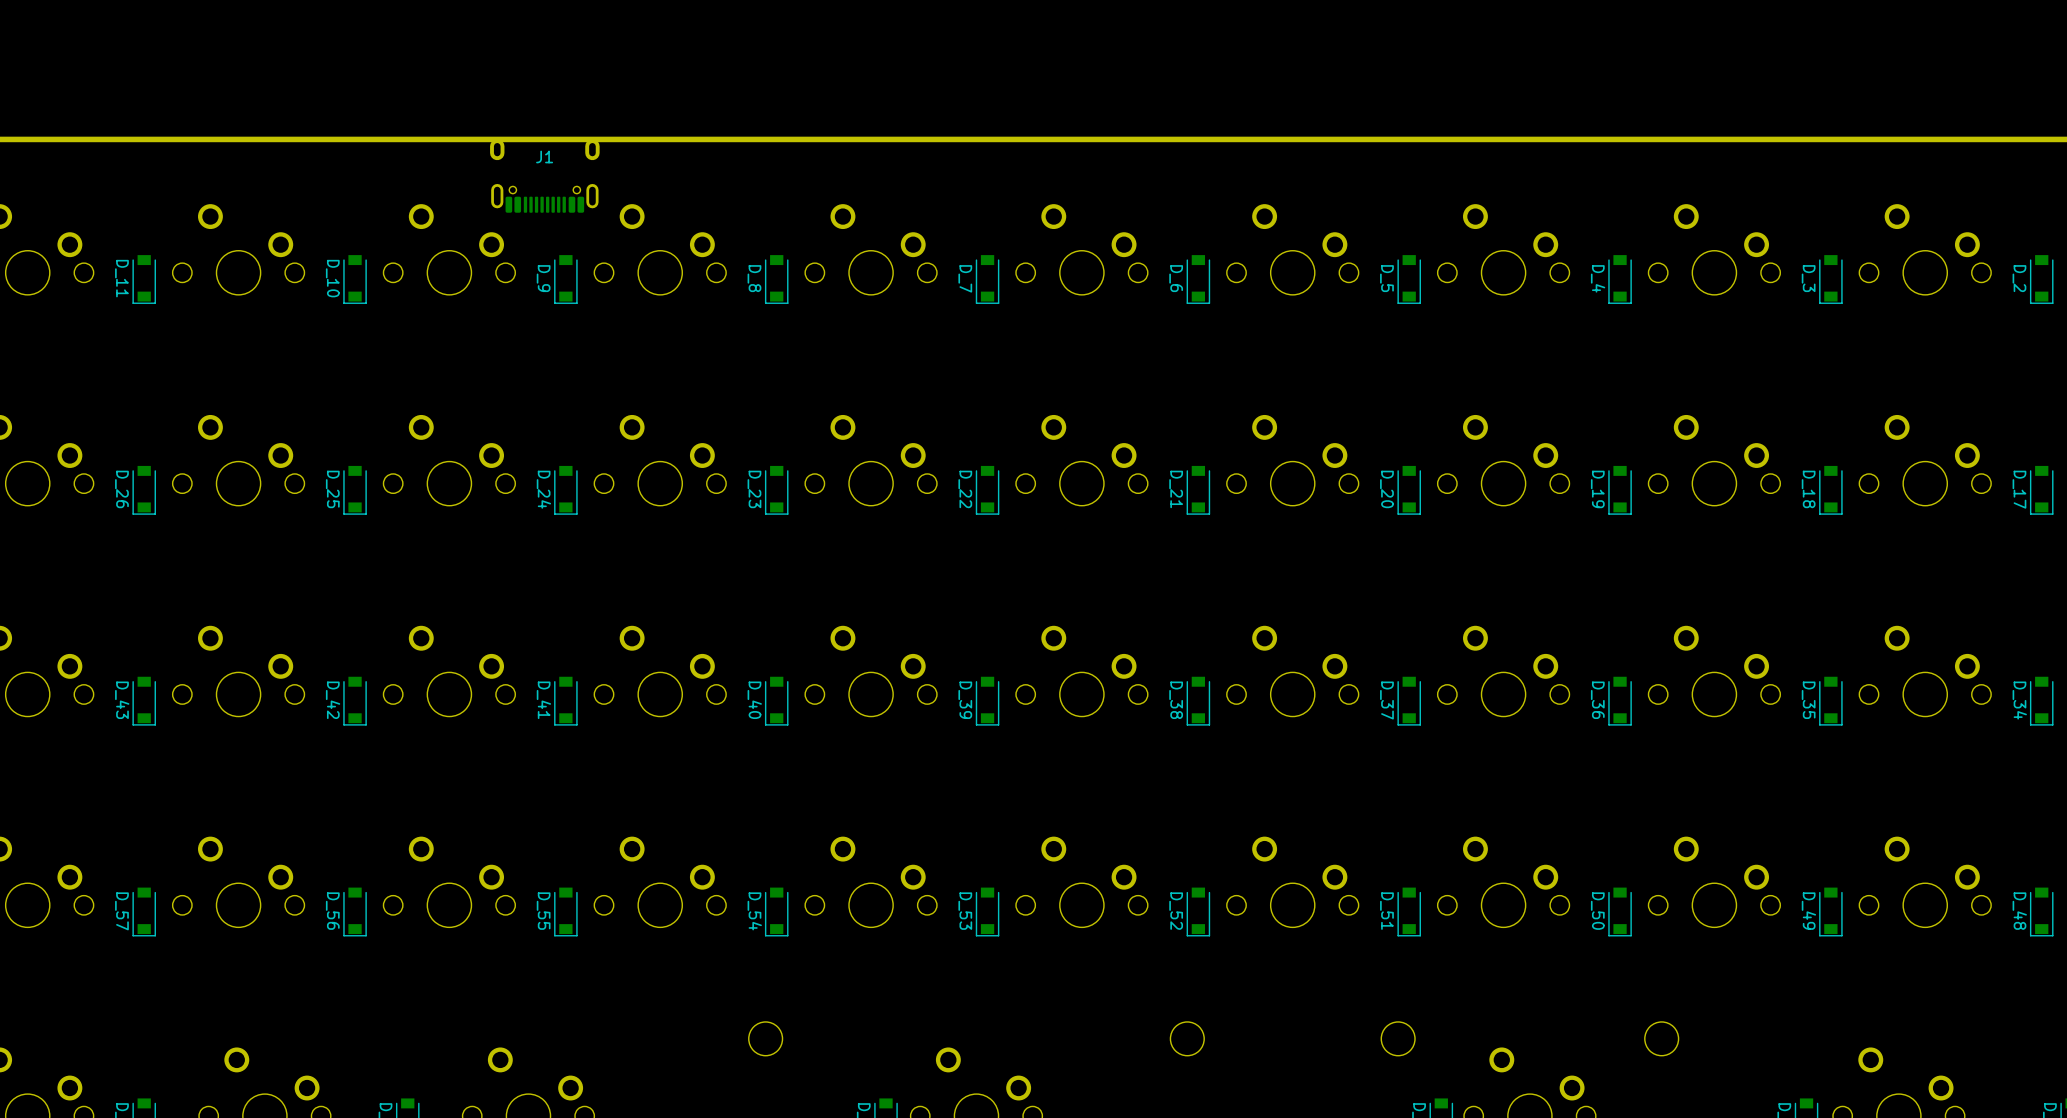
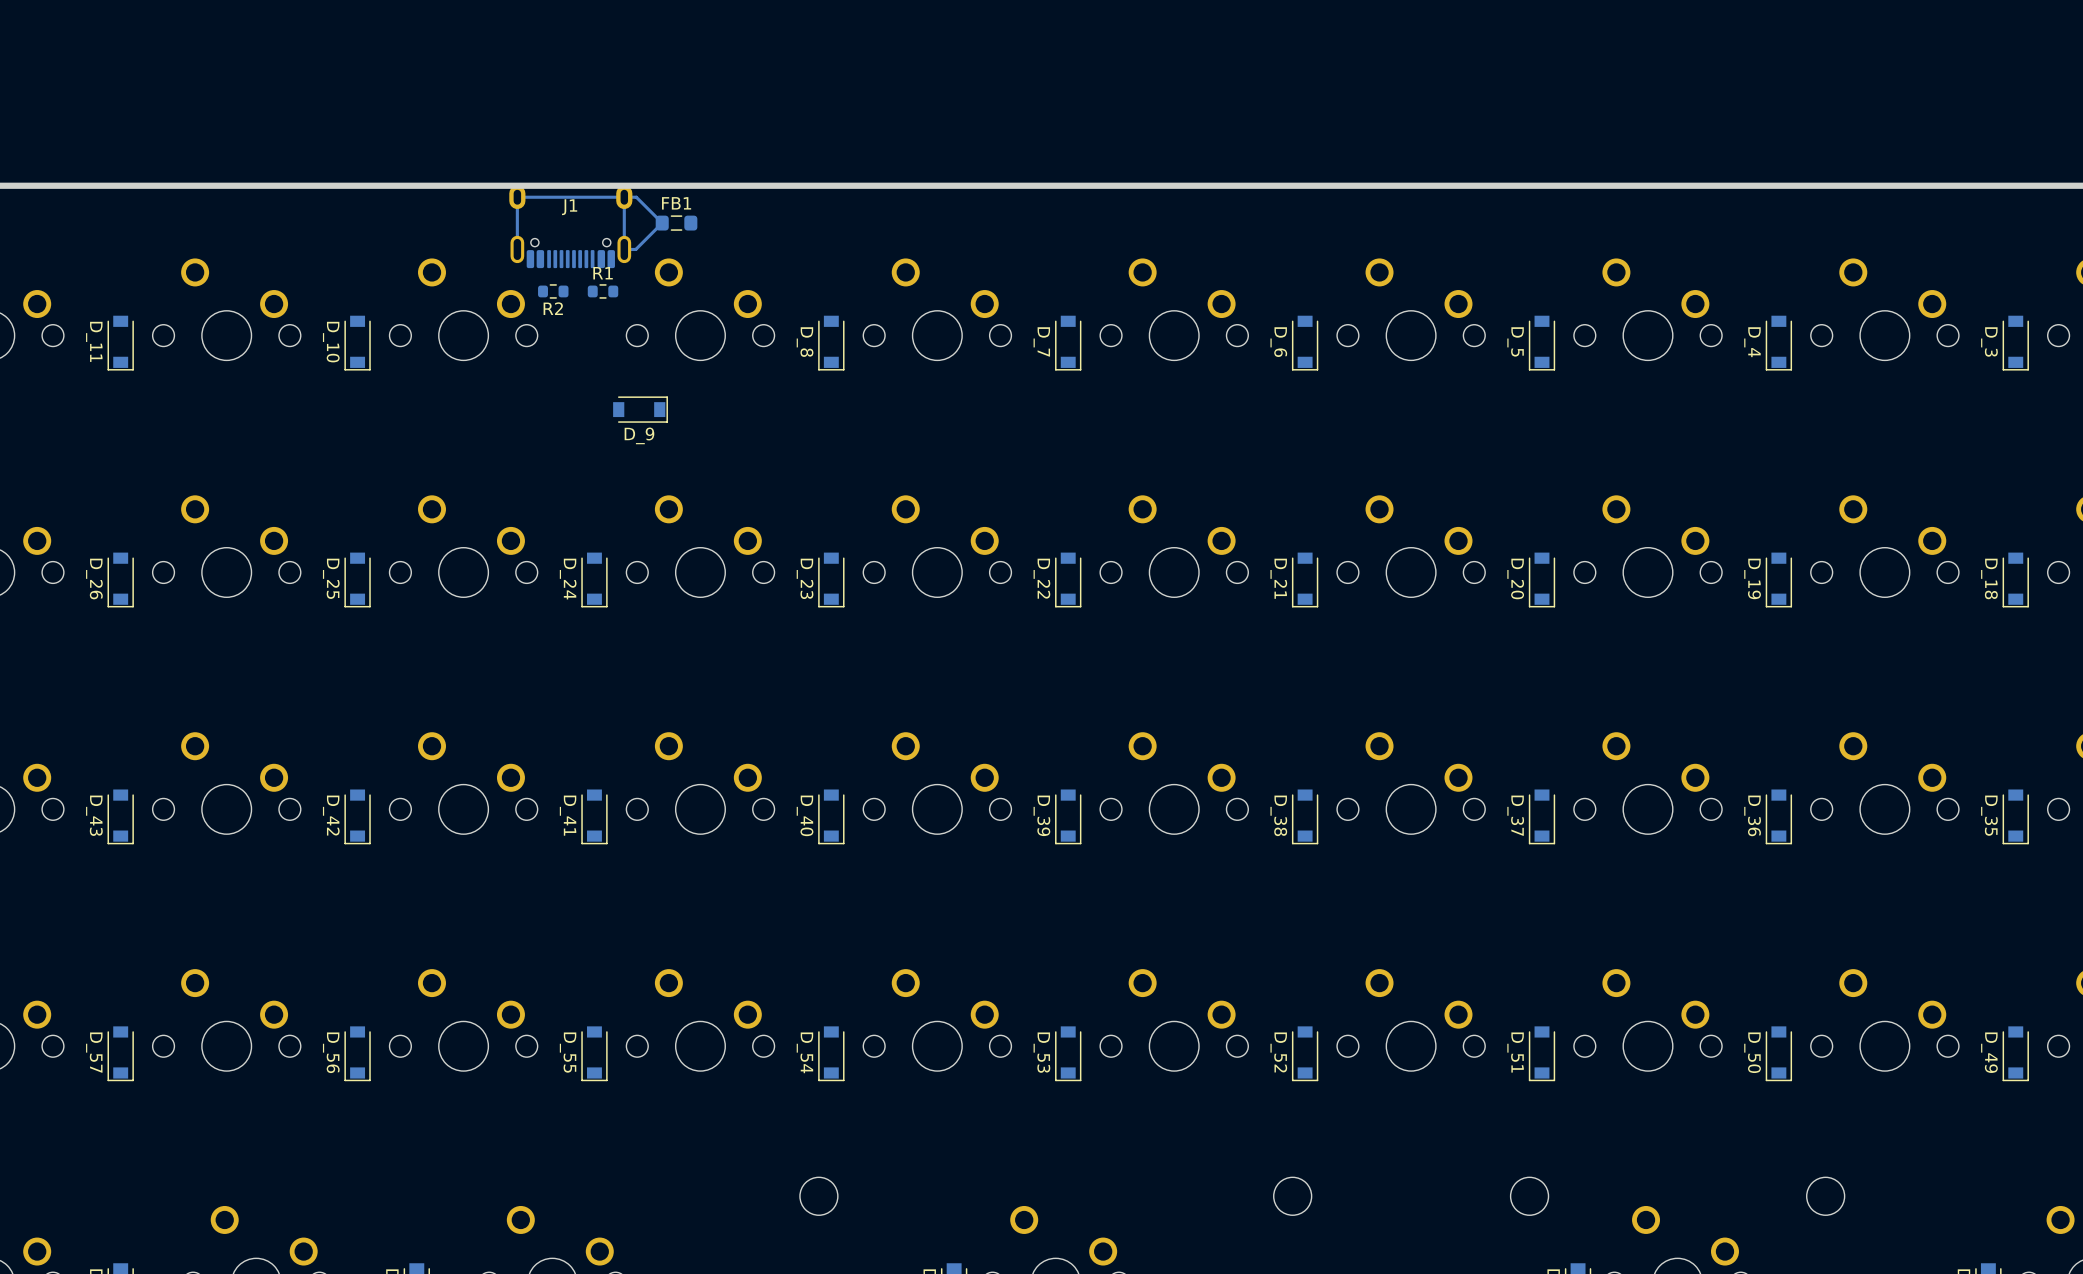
track: none -> (624, 197) (624, 249) (635, 249) (662, 223) (636, 197) (517, 197) (517, 249)
FB1: none -> (676, 223)
R2: none -> (553, 291)
R1: none -> (603, 291)
D_9 rotation: 0° (565, 279) -> 90° counterclockwise (640, 409)
D_9 position: (565, 279) -> (640, 409)

